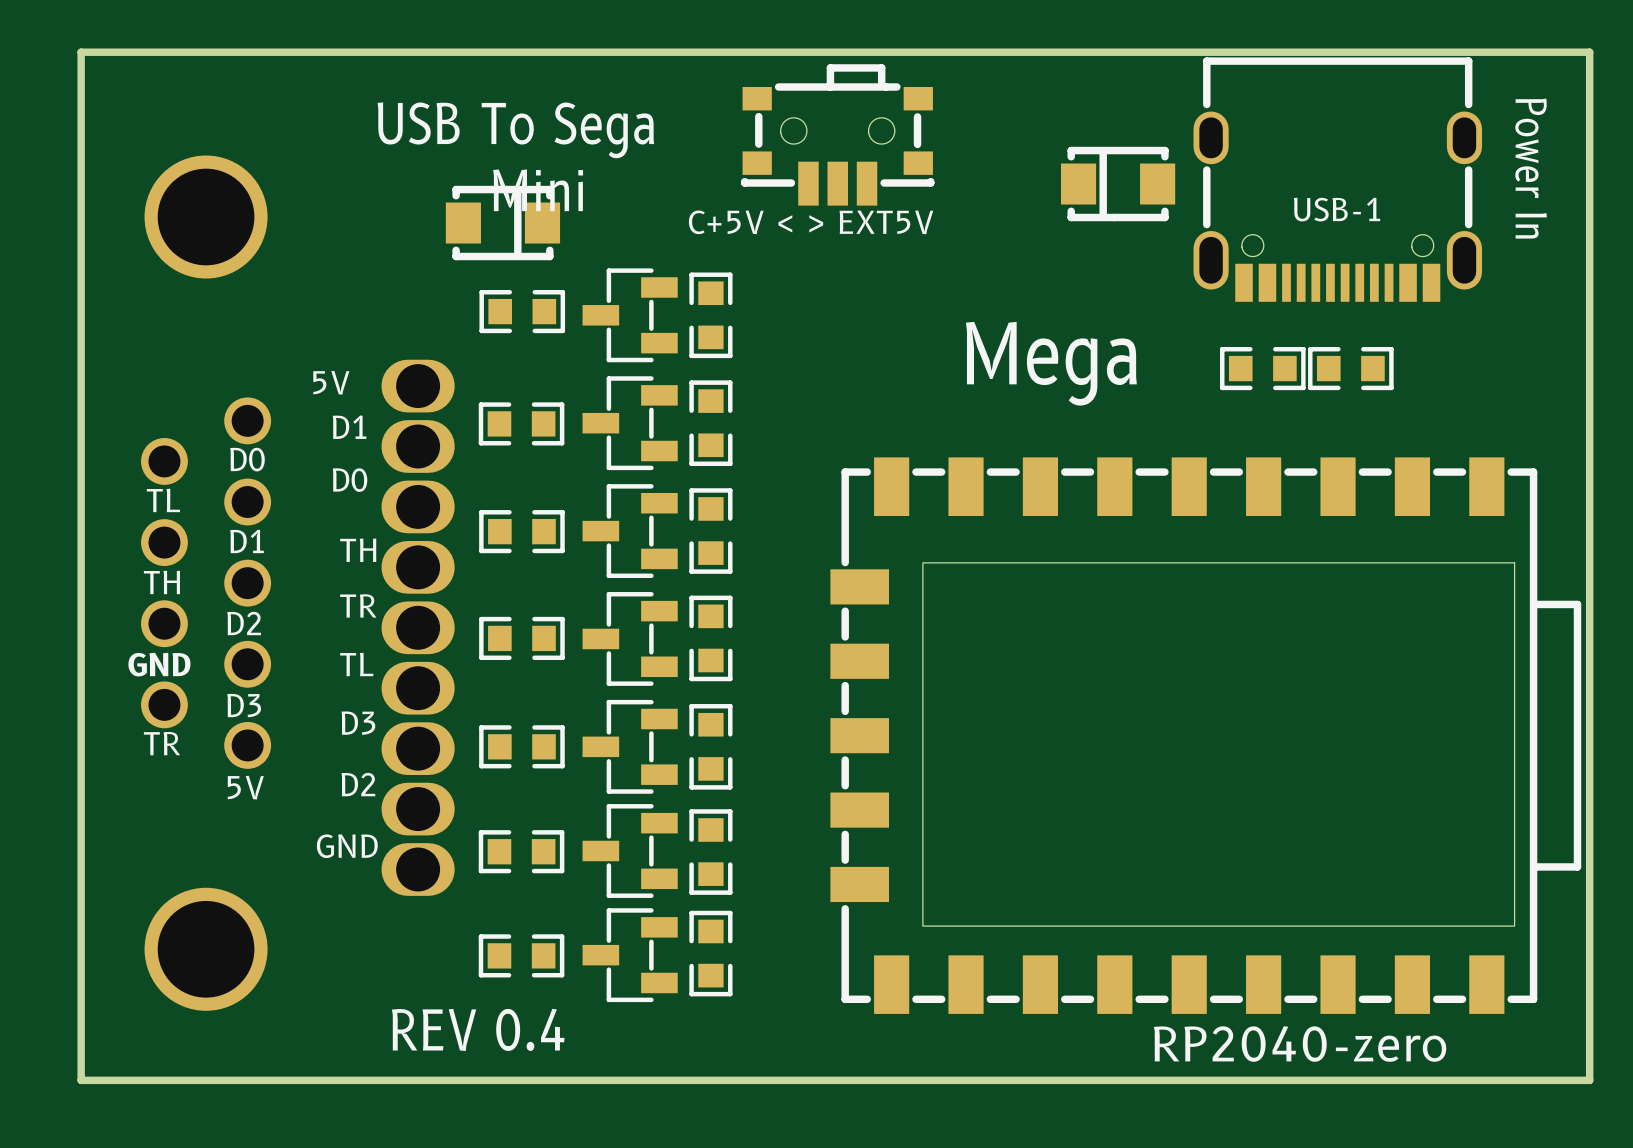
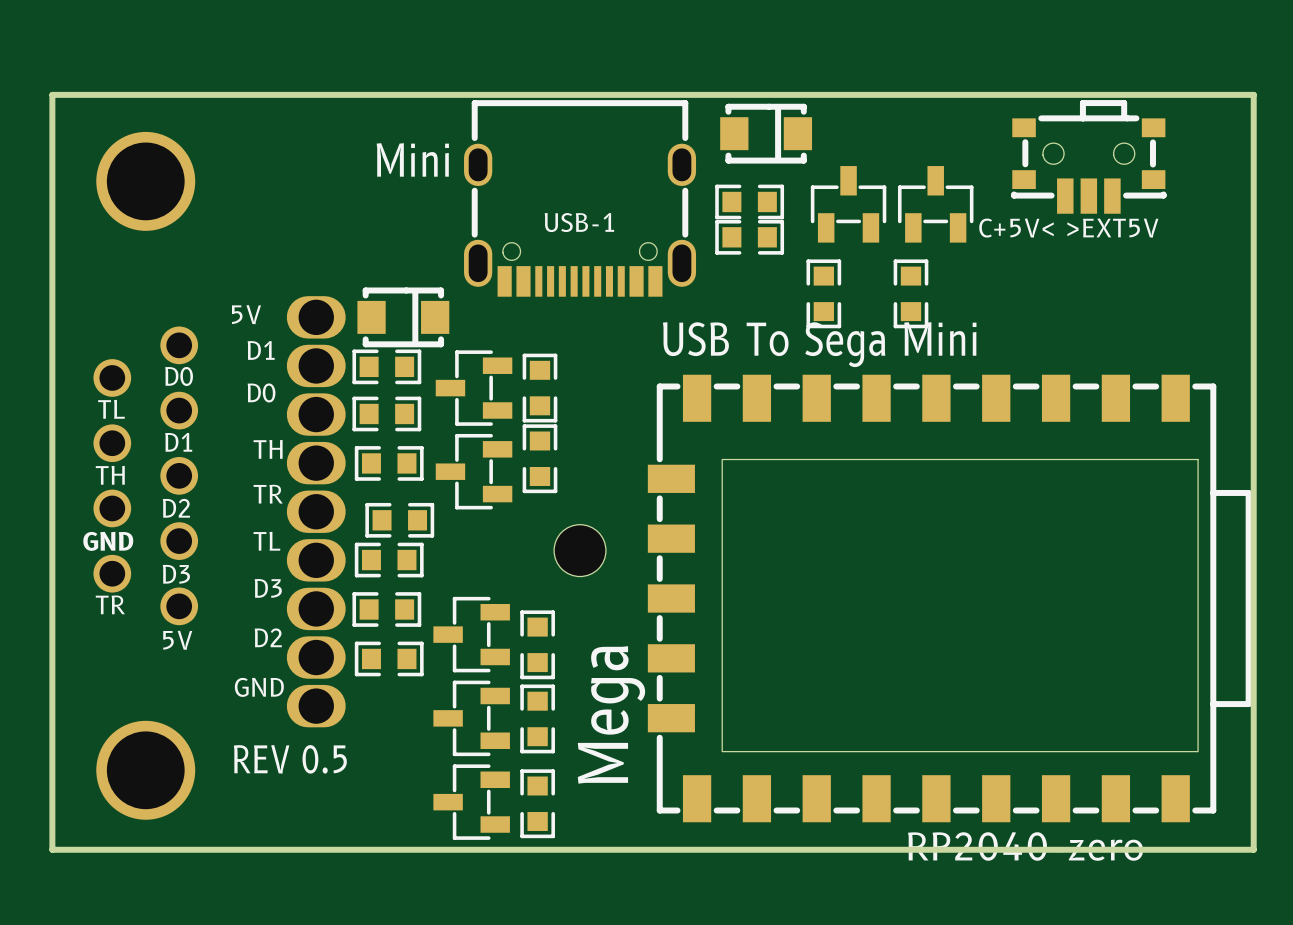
board edge: (81, 52) (1589, 52) (1589, 1080) (81, 1080) (81, 52) -> (52, 94) (52, 849) (1253, 849) (1253, 94) (52, 94)
text: USB To Sega (515, 130) -> none
part position: (837, 134) -> (1088, 156)
text: Power In (1531, 168) -> none
USB-1 position: (1337, 179) -> (580, 198)
part rotation: 0° (1118, 184) -> 180° (766, 133)
part position: (1118, 184) -> (766, 133)
text: C+5V < > EXT5V (811, 222) -> none
part position: (502, 223) -> (403, 317)
part: none -> (749, 201)
part: none -> (848, 204)
part: none -> (935, 204)
text: none -> C+5V< >EXT5V (1068, 228)
part: none -> (749, 237)
part: (522, 311) -> none
part: (630, 315) -> none
part: (710, 315) -> none
part: none -> (823, 293)
part: none -> (910, 293)
text rotation: 0° (1051, 363) -> 90° counterclockwise (611, 714)
text position: Mega (1051, 363) -> Mega (611, 714)
part: (1262, 368) -> none
part: (1350, 368) -> none
text: none -> USB To Sega Mini (819, 344)
part position: (521, 423) -> (386, 366)
part: (630, 423) -> none
part: (710, 423) -> none
part: none -> (474, 388)
part: none -> (539, 388)
part: none -> (386, 413)
part: (521, 531) -> none
part: (630, 531) -> none
part: (710, 531) -> none
part: none -> (539, 458)
part: none -> (389, 463)
part: none -> (474, 471)
part: (630, 638) -> none
part: (710, 638) -> none
part: none -> (580, 550)
part: none -> (389, 560)
part position: (521, 746) -> (386, 609)
part: (630, 746) -> none
part: (710, 746) -> none
part: none -> (471, 634)
part: none -> (537, 644)
part position: (521, 851) -> (389, 658)
part: (630, 851) -> none
part: (710, 852) -> none
part: none -> (471, 718)
part: none -> (537, 718)
text: none -> REV 0.5 (290, 759)
part: (710, 953) -> none
part: (521, 955) -> none
part: (630, 955) -> none
part: none -> (471, 802)
part: none -> (537, 803)
text: REV 0.4 (478, 1029) -> none

